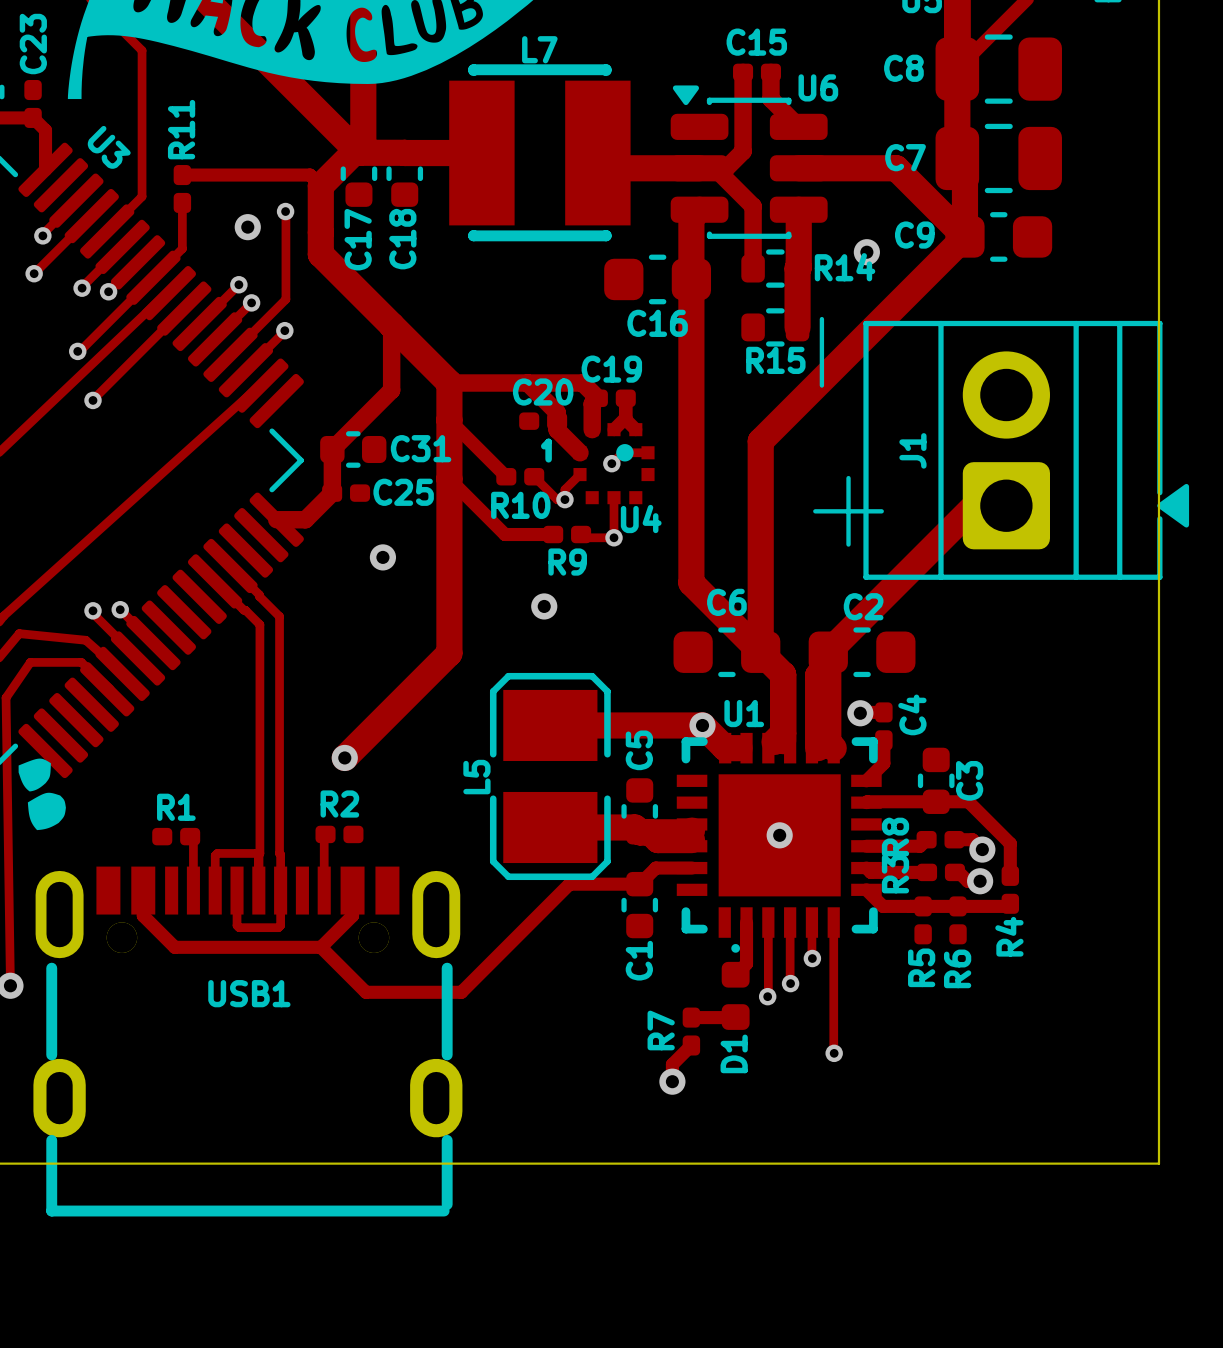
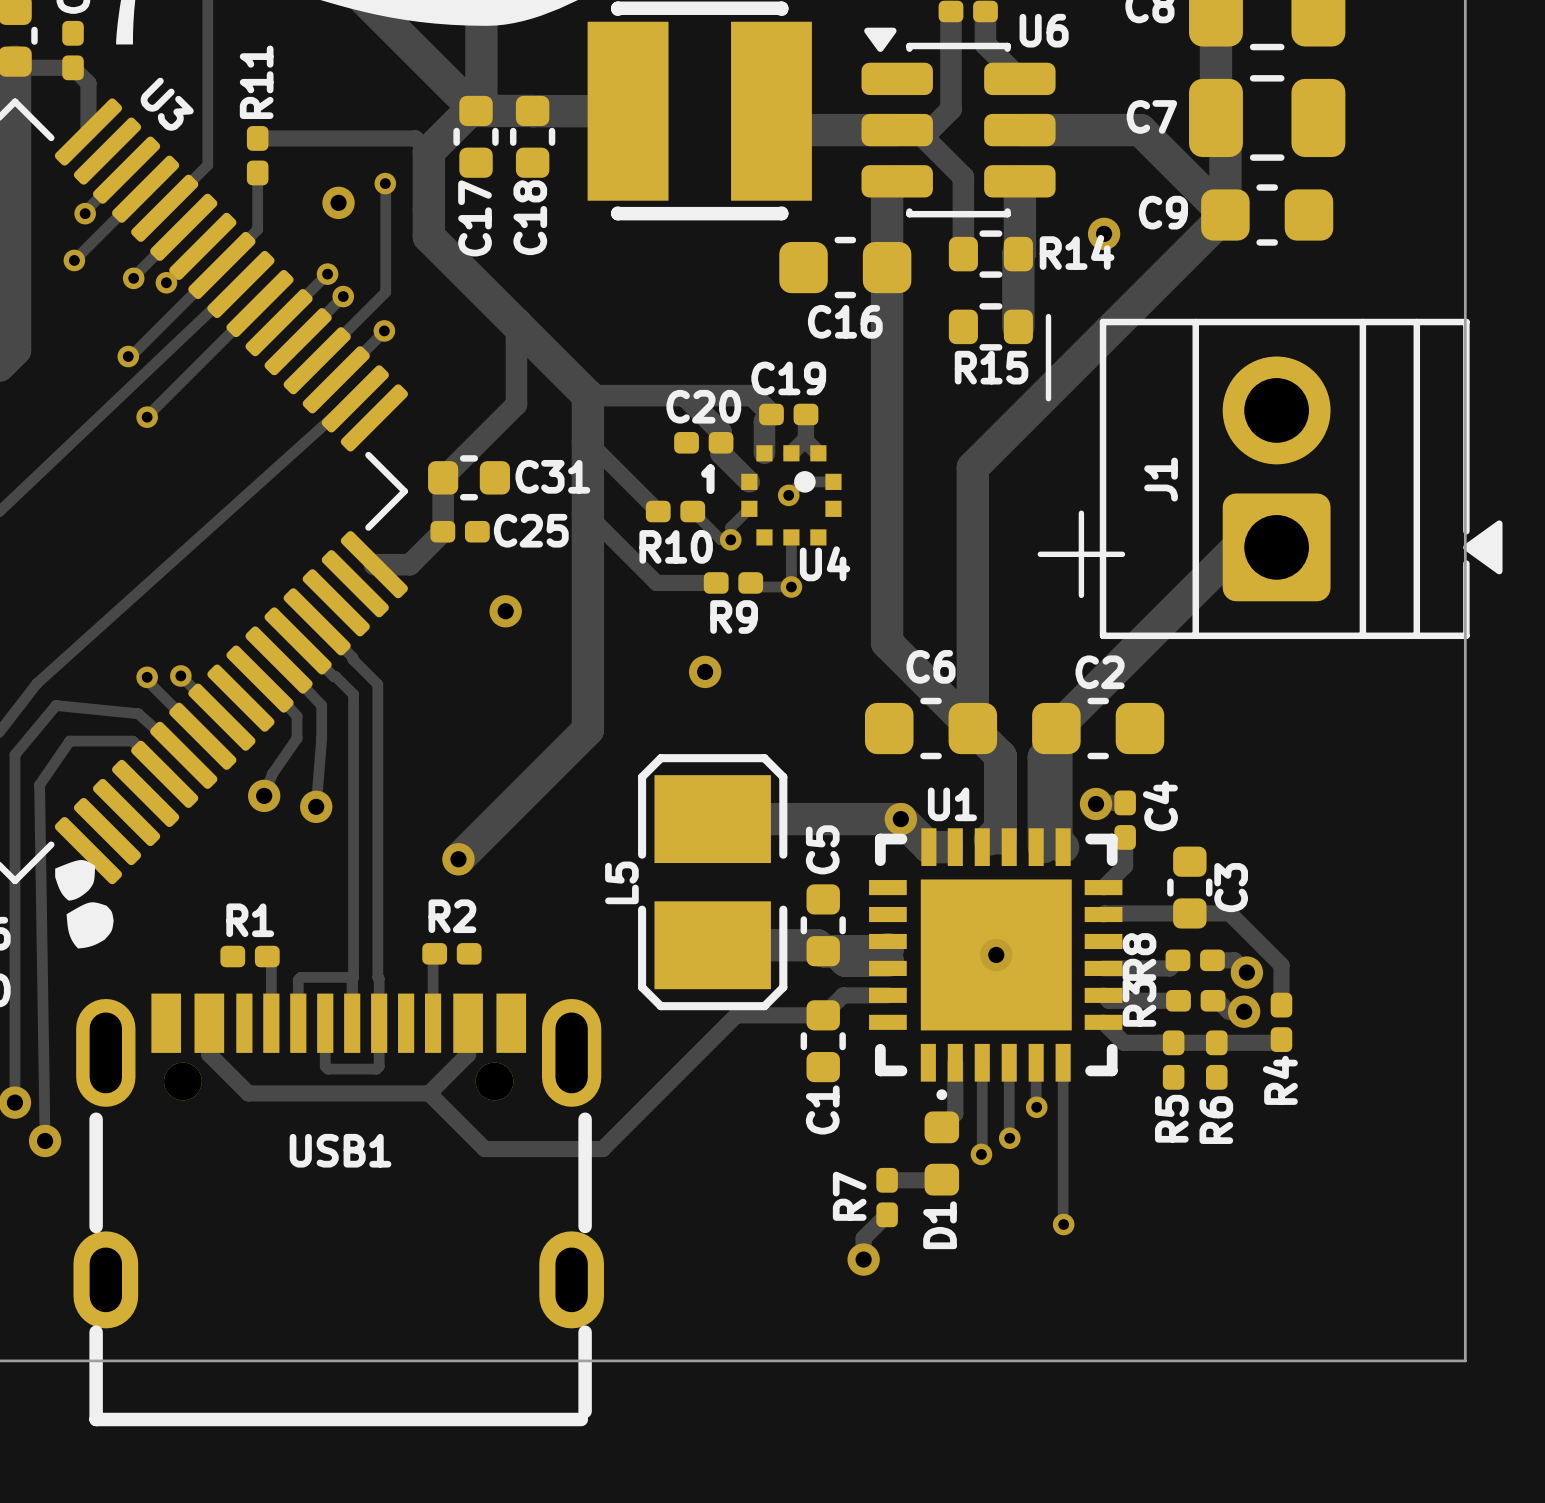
track: none -> (280, 661) (321, 705) (321, 738) (316, 806)
track: none -> (277, 694) (297, 716) (297, 738) (272, 773) (264, 795)
via: none -> (264, 795)
via: none -> (316, 806)

